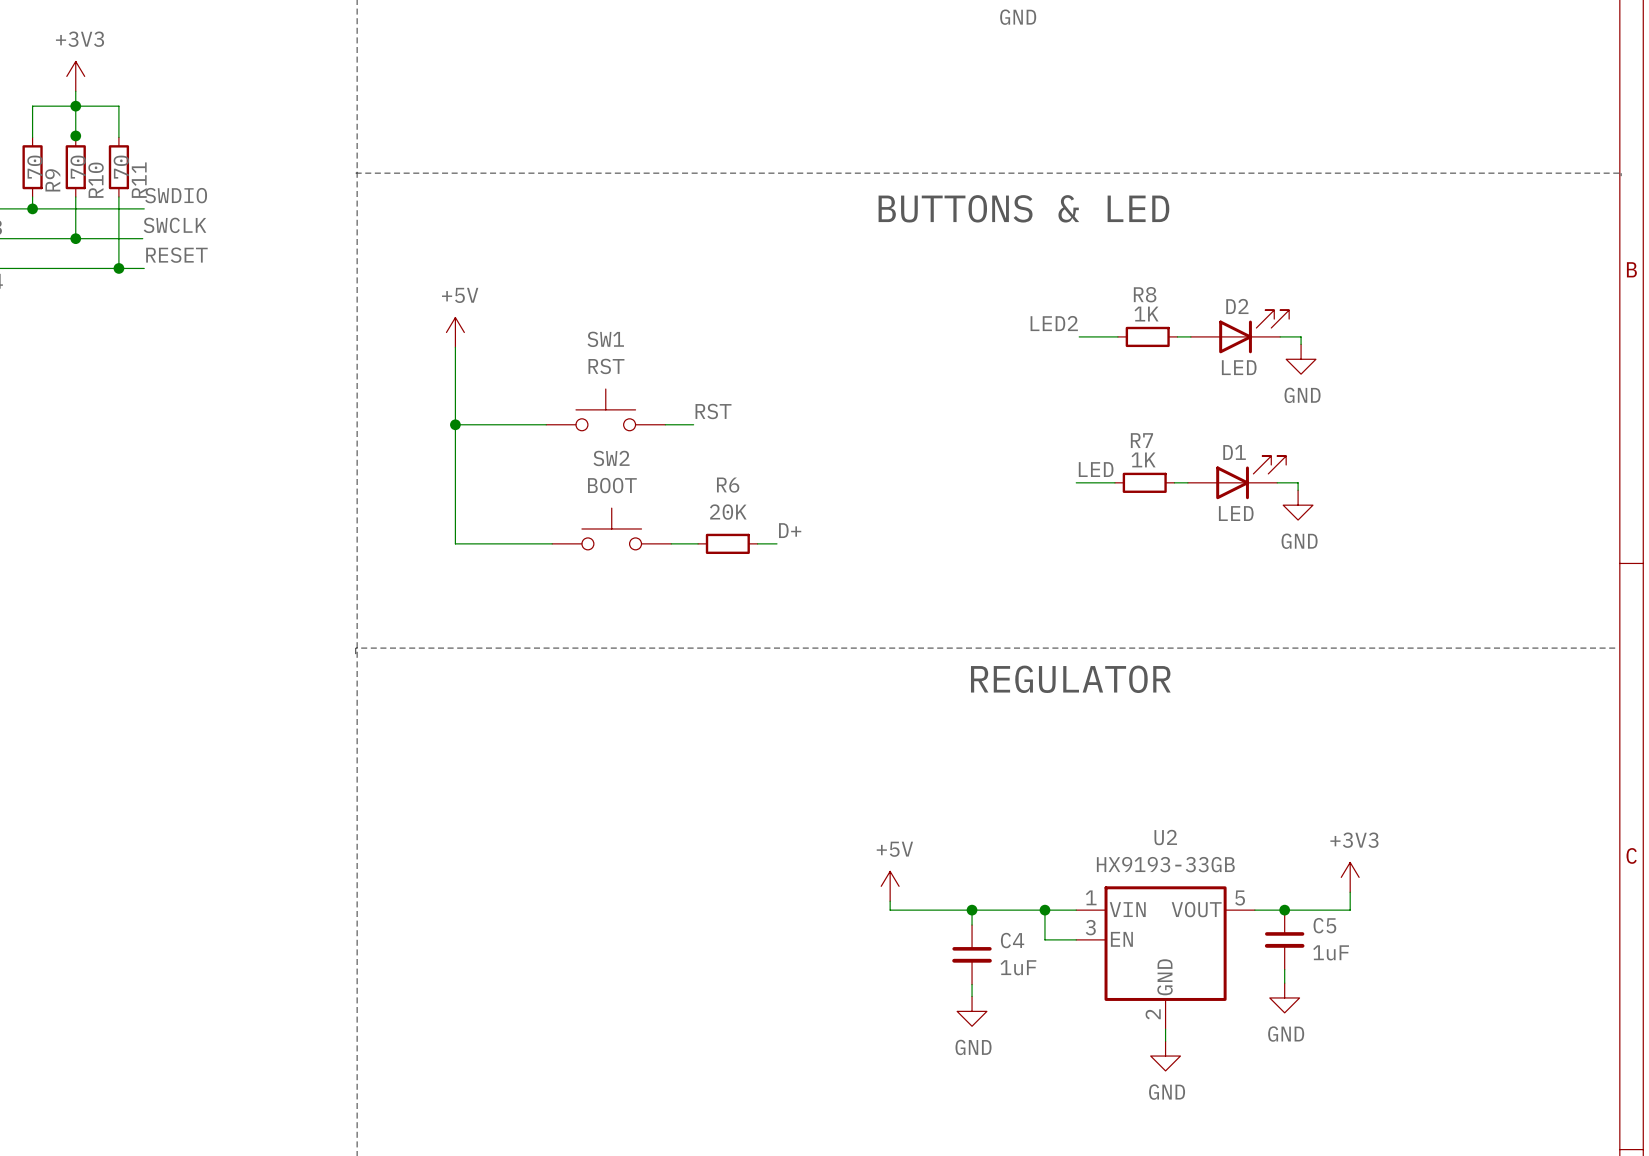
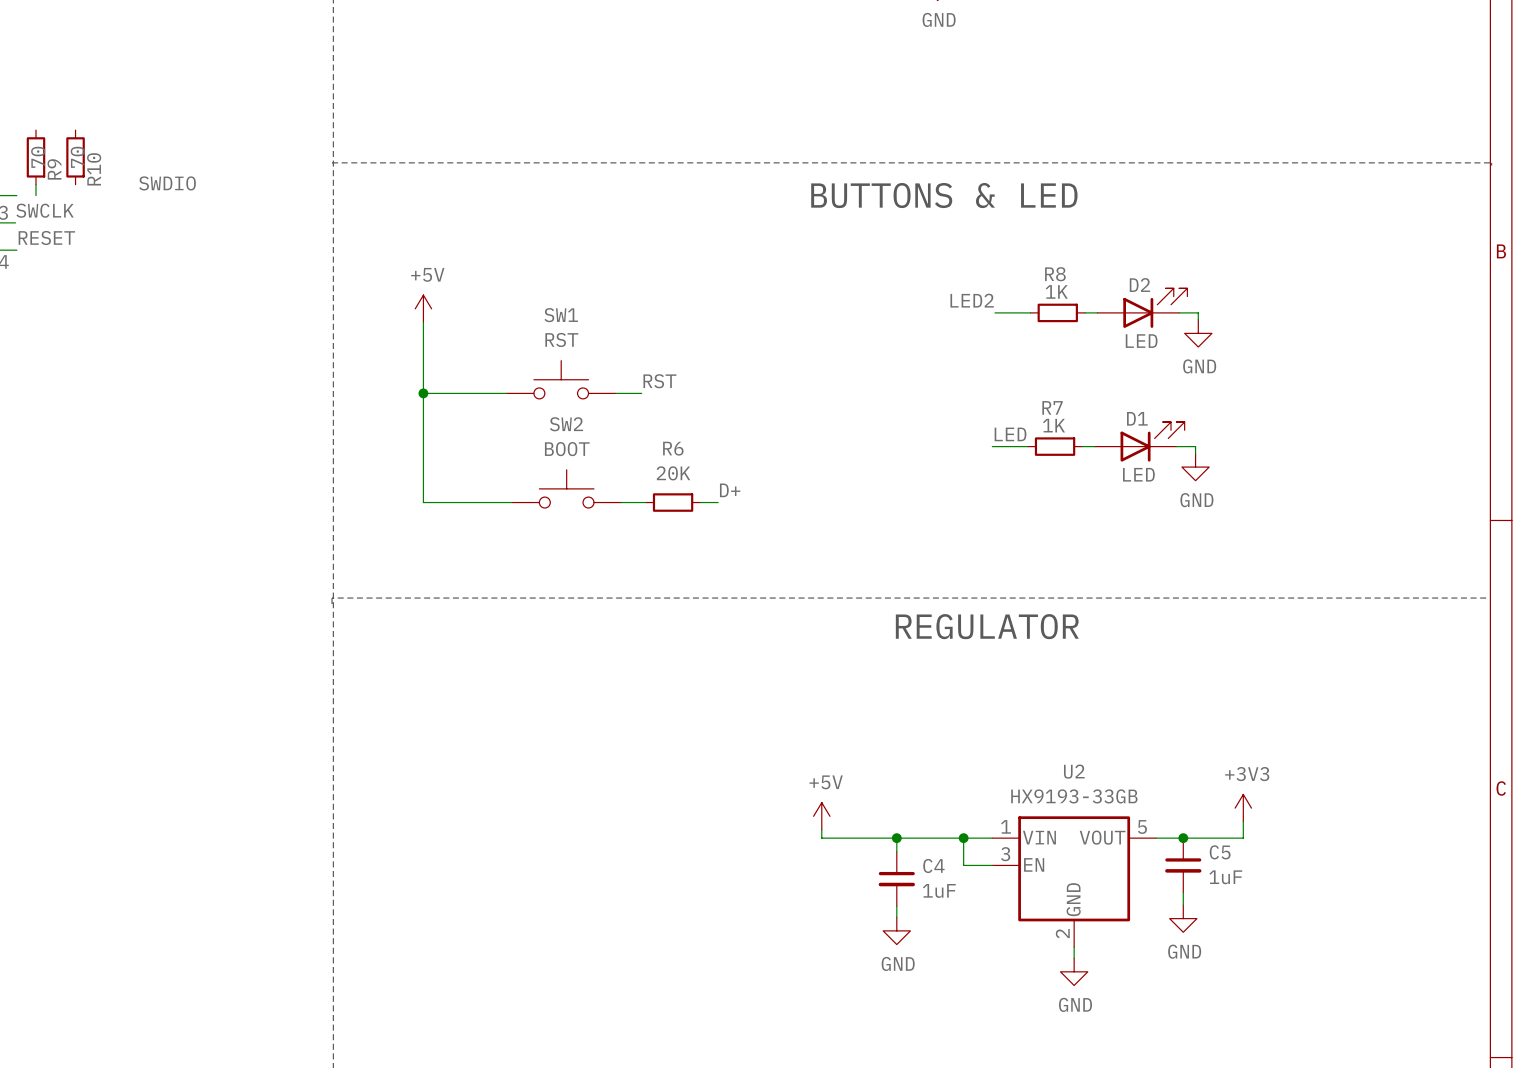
power symbol: +3V3 (75, 76) -> none
wire: (75, 91) (75, 137) -> none
junction: (75, 106) -> none
junction: (75, 135) -> none
wire: (32, 137) (32, 106) (118, 106) (118, 137) -> none
R11: 70 (118, 167) -> none
wire: (75, 196) (75, 238) -> none
wire: (118, 196) (118, 268) -> none
wire: (11, 208) (144, 208) -> none
junction: (32, 208) -> none
label position: SWCLK (174, 225) -> SWCLK (45, 210)
wire: (10, 238) (142, 238) -> none
junction: (75, 238) -> none
label position: RESET (176, 255) -> RESET (46, 237)
wire: (11, 268) (144, 268) -> none
junction: (118, 268) -> none

